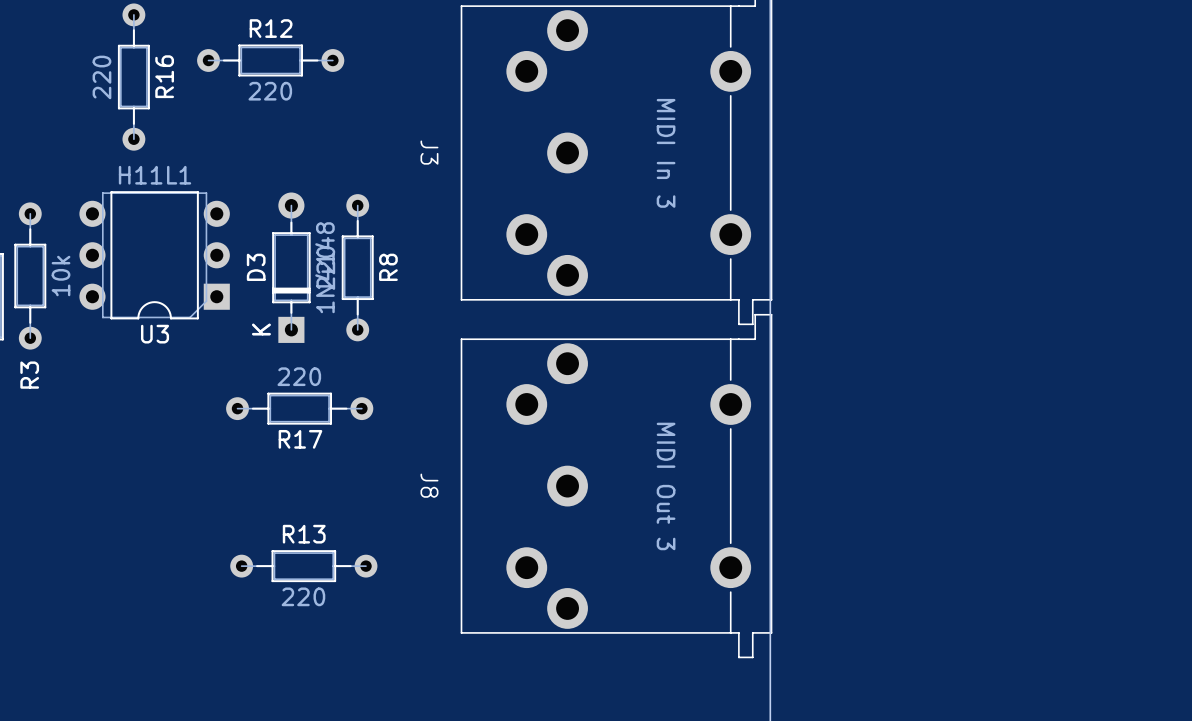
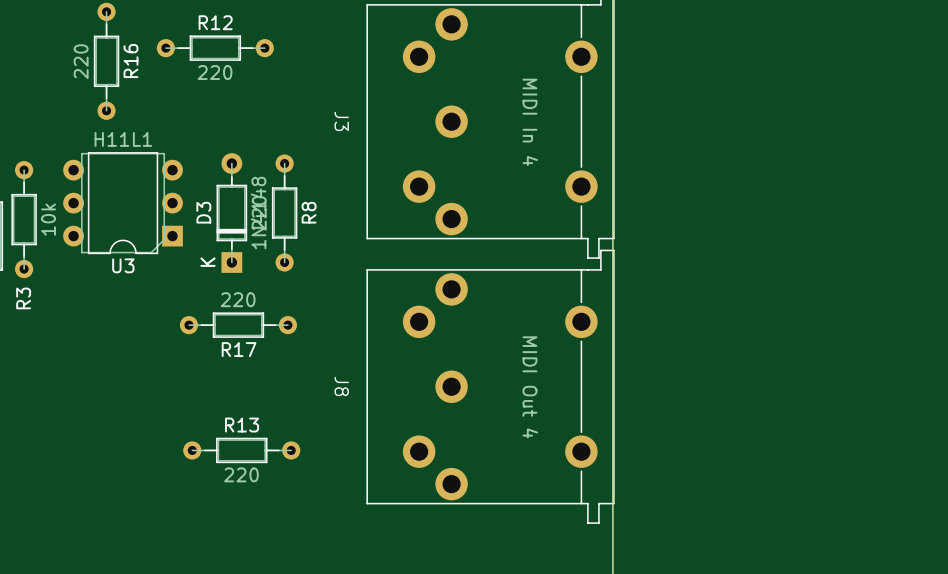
J3 value: MIDI In 3 (666, 153) -> MIDI In 4 (530, 122)
J8 value: MIDI Out 3 (666, 486) -> MIDI Out 4 (530, 387)

